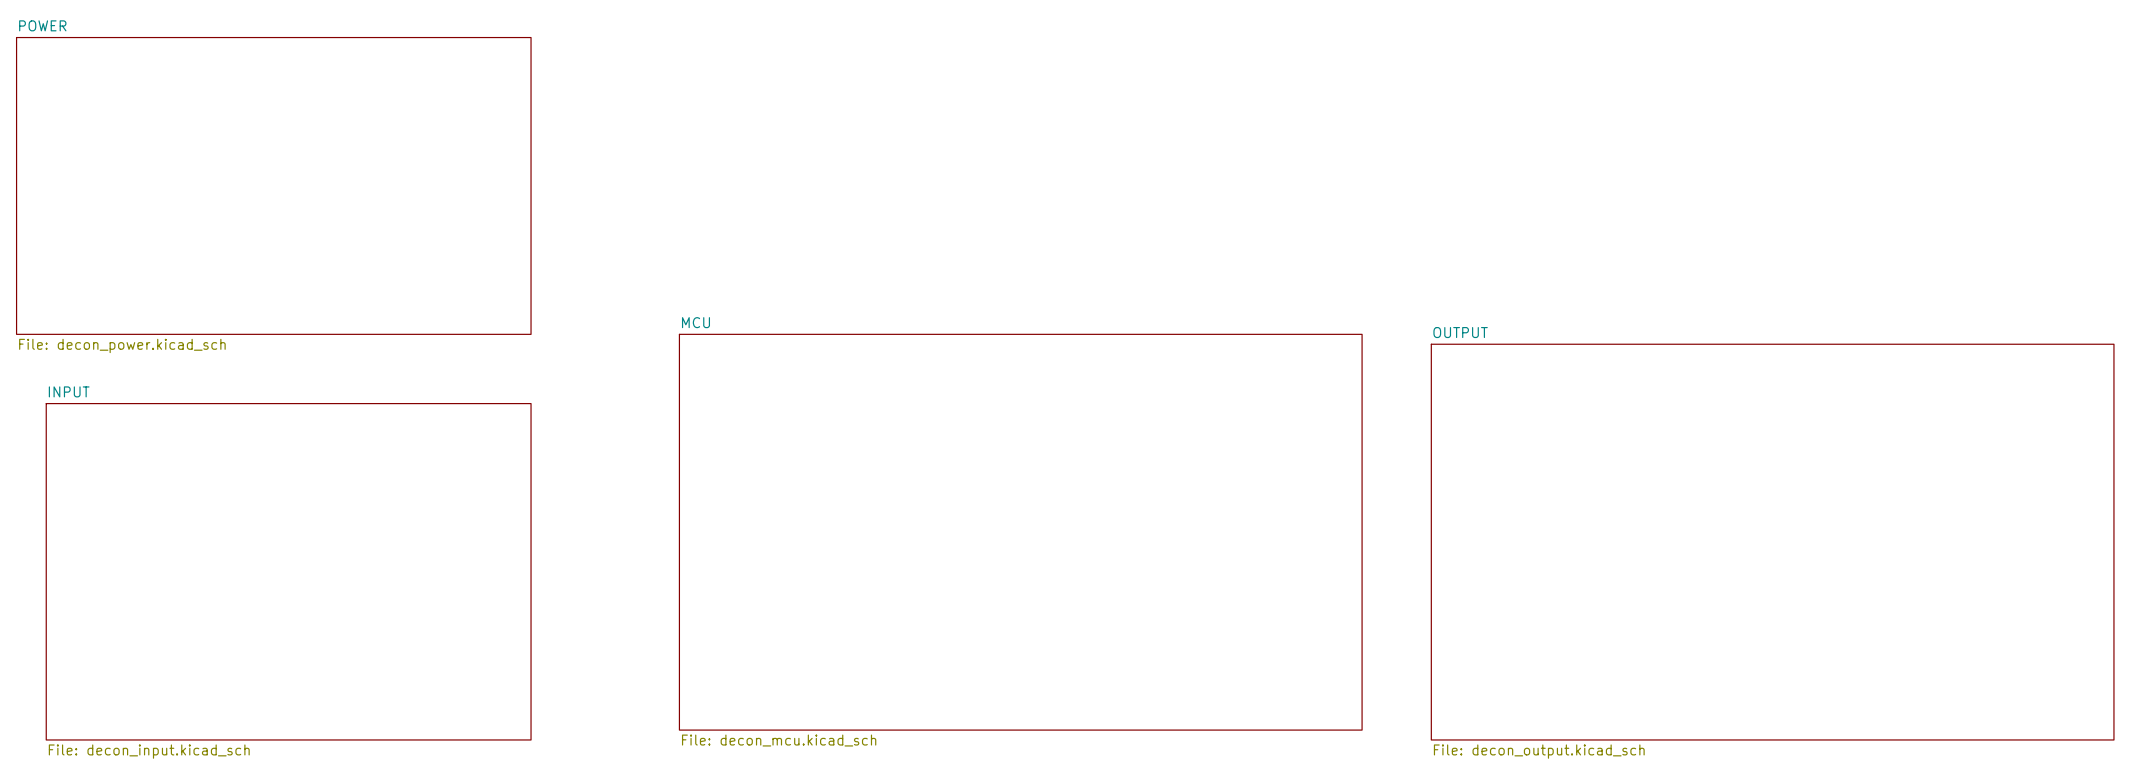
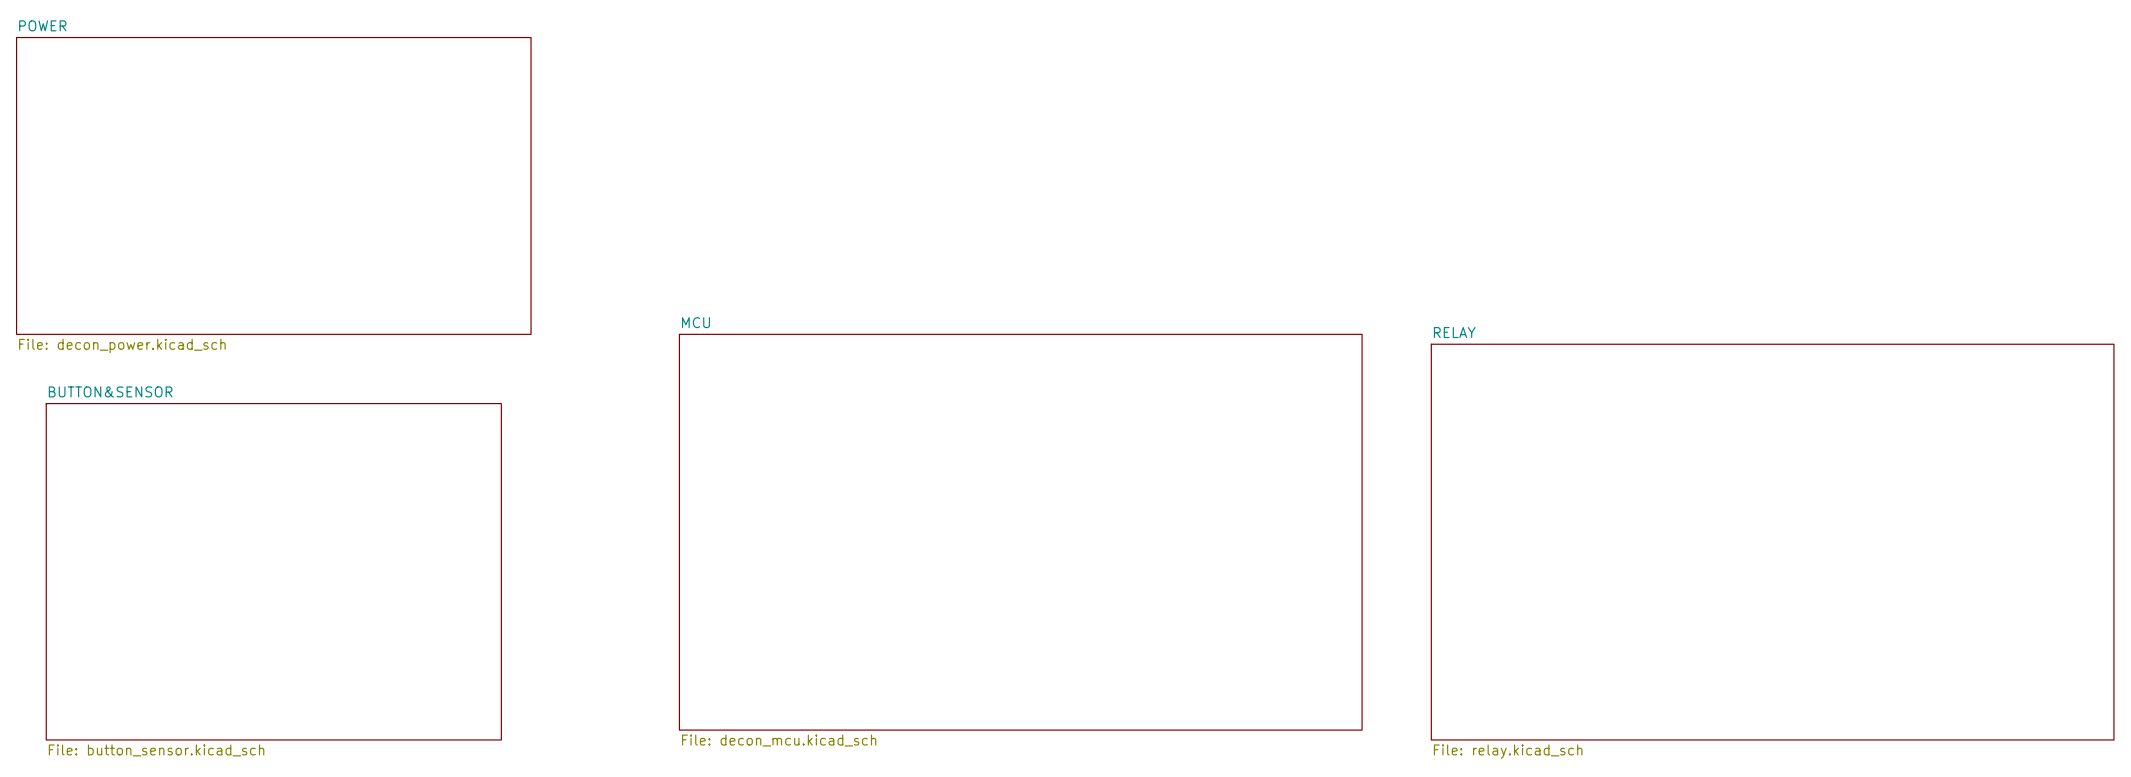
sheet OUTPUT name: OUTPUT (1460, 332) -> RELAY (1454, 332)
sheet BUTTON&SENSOR: none -> File: button_sensor.kicad_sch (273, 571)
sheet INPUT: File: decon_input.kicad_sch (288, 571) -> none
sheet OUTPUT value: File: decon_output.kicad_sch (1539, 751) -> File: relay.kicad_sch (1508, 751)

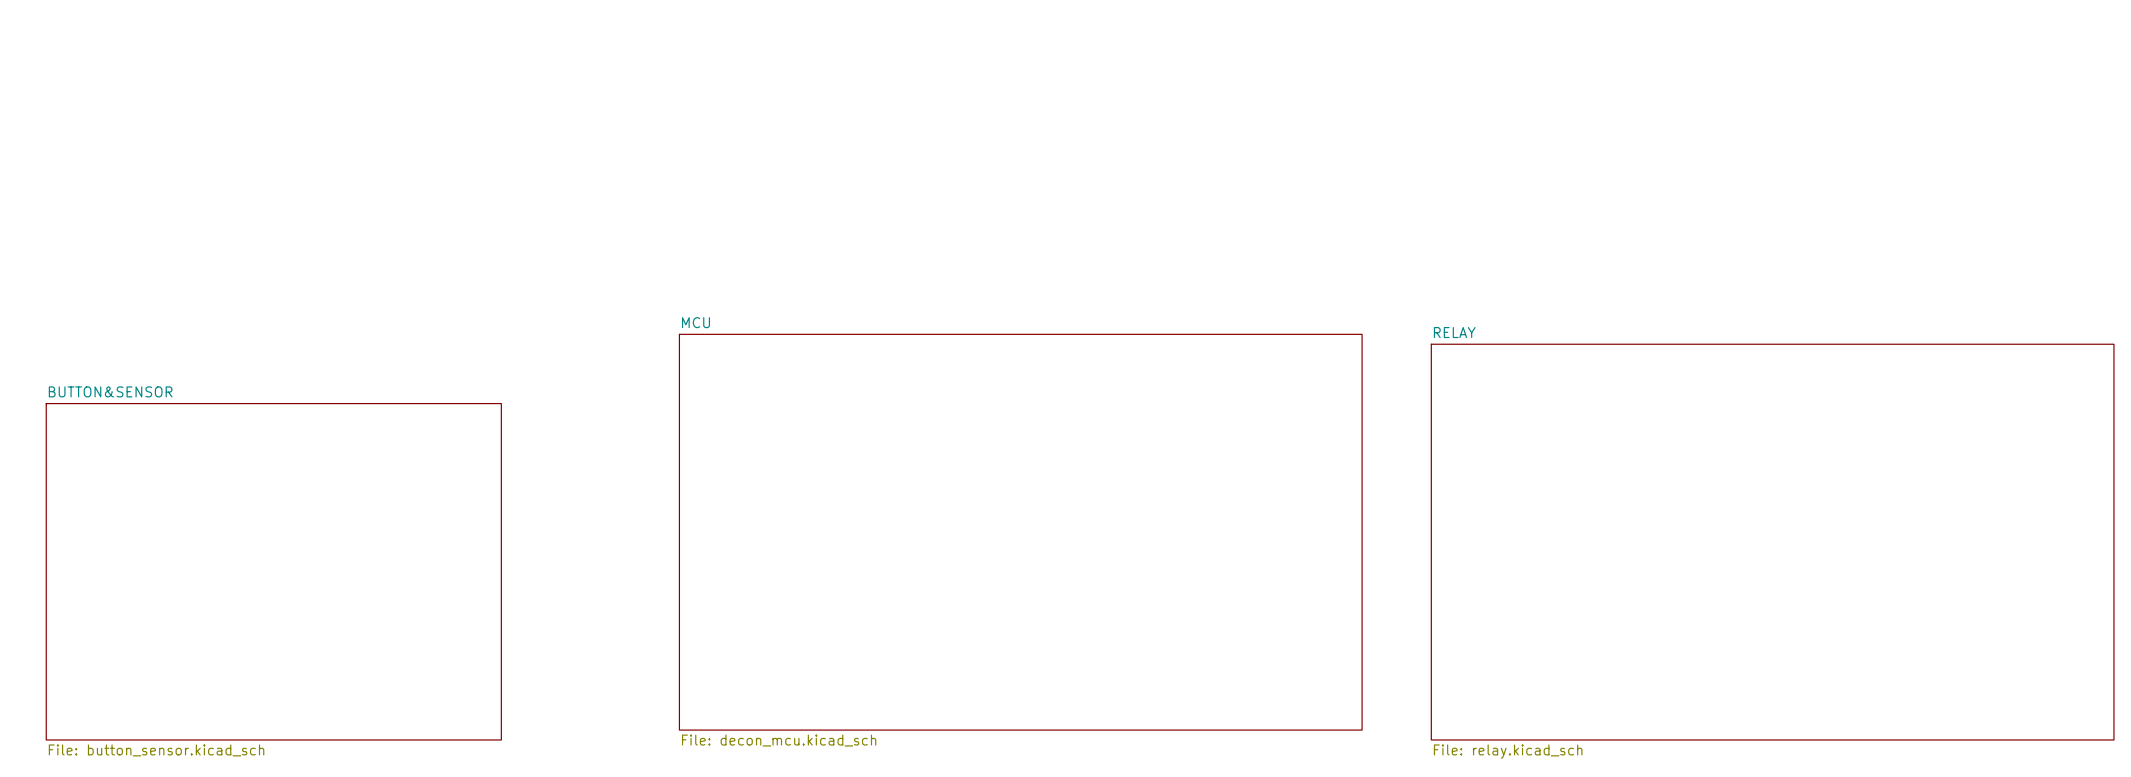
sheet POWER: File: decon_power.kicad_sch (273, 185) -> none

